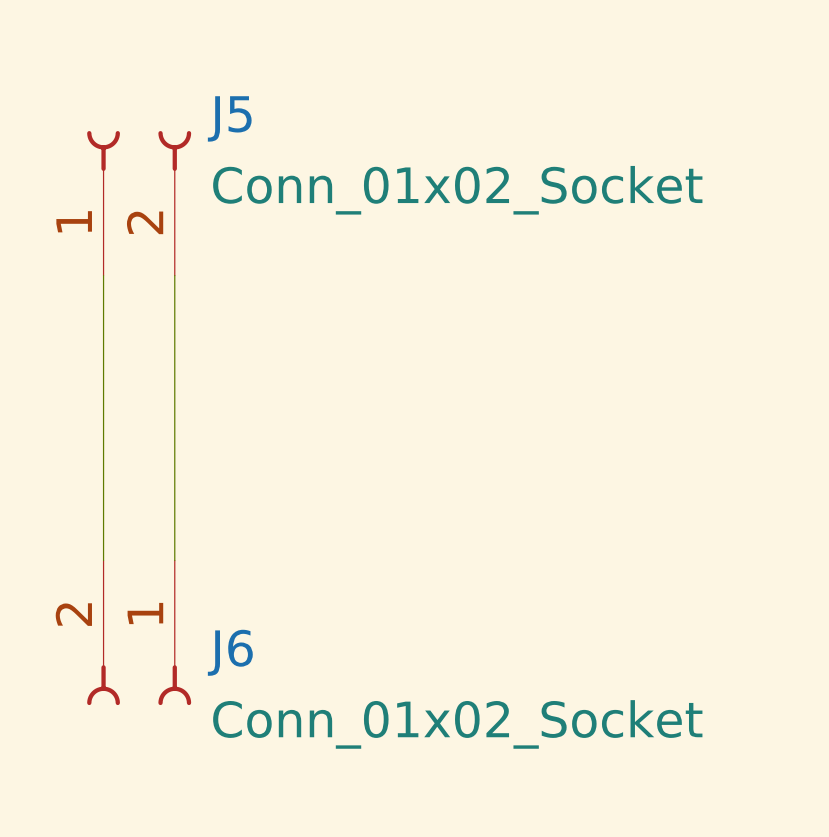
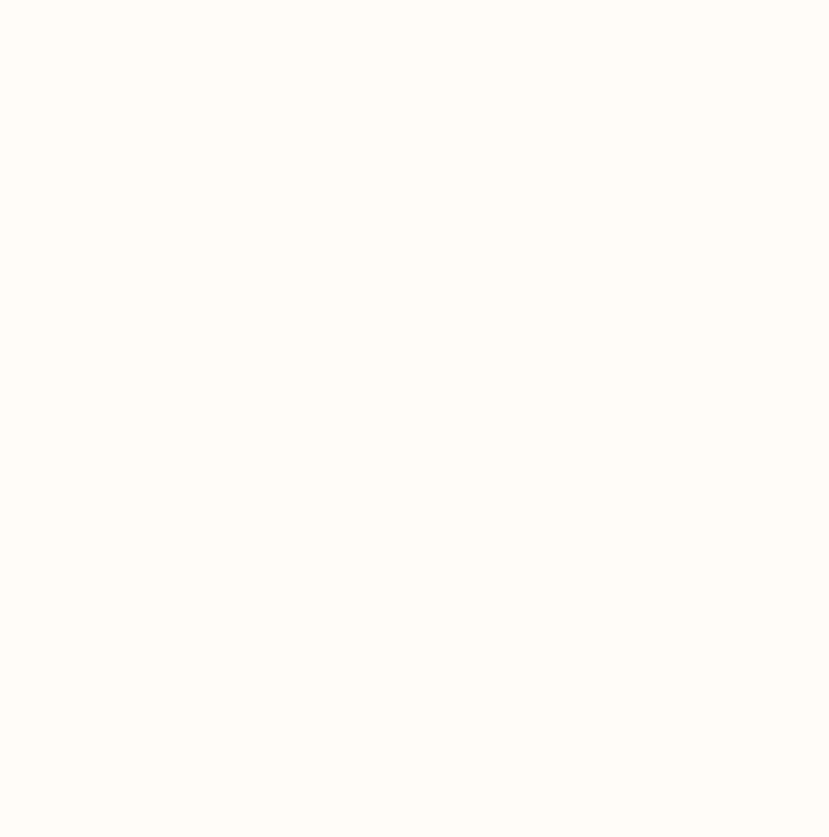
J5: Conn_01x02_Socket (139, 203) -> none
wire: (103, 275) (103, 560) -> none
wire: (174, 275) (174, 560) -> none
J6: Conn_01x02_Socket (139, 632) -> none

